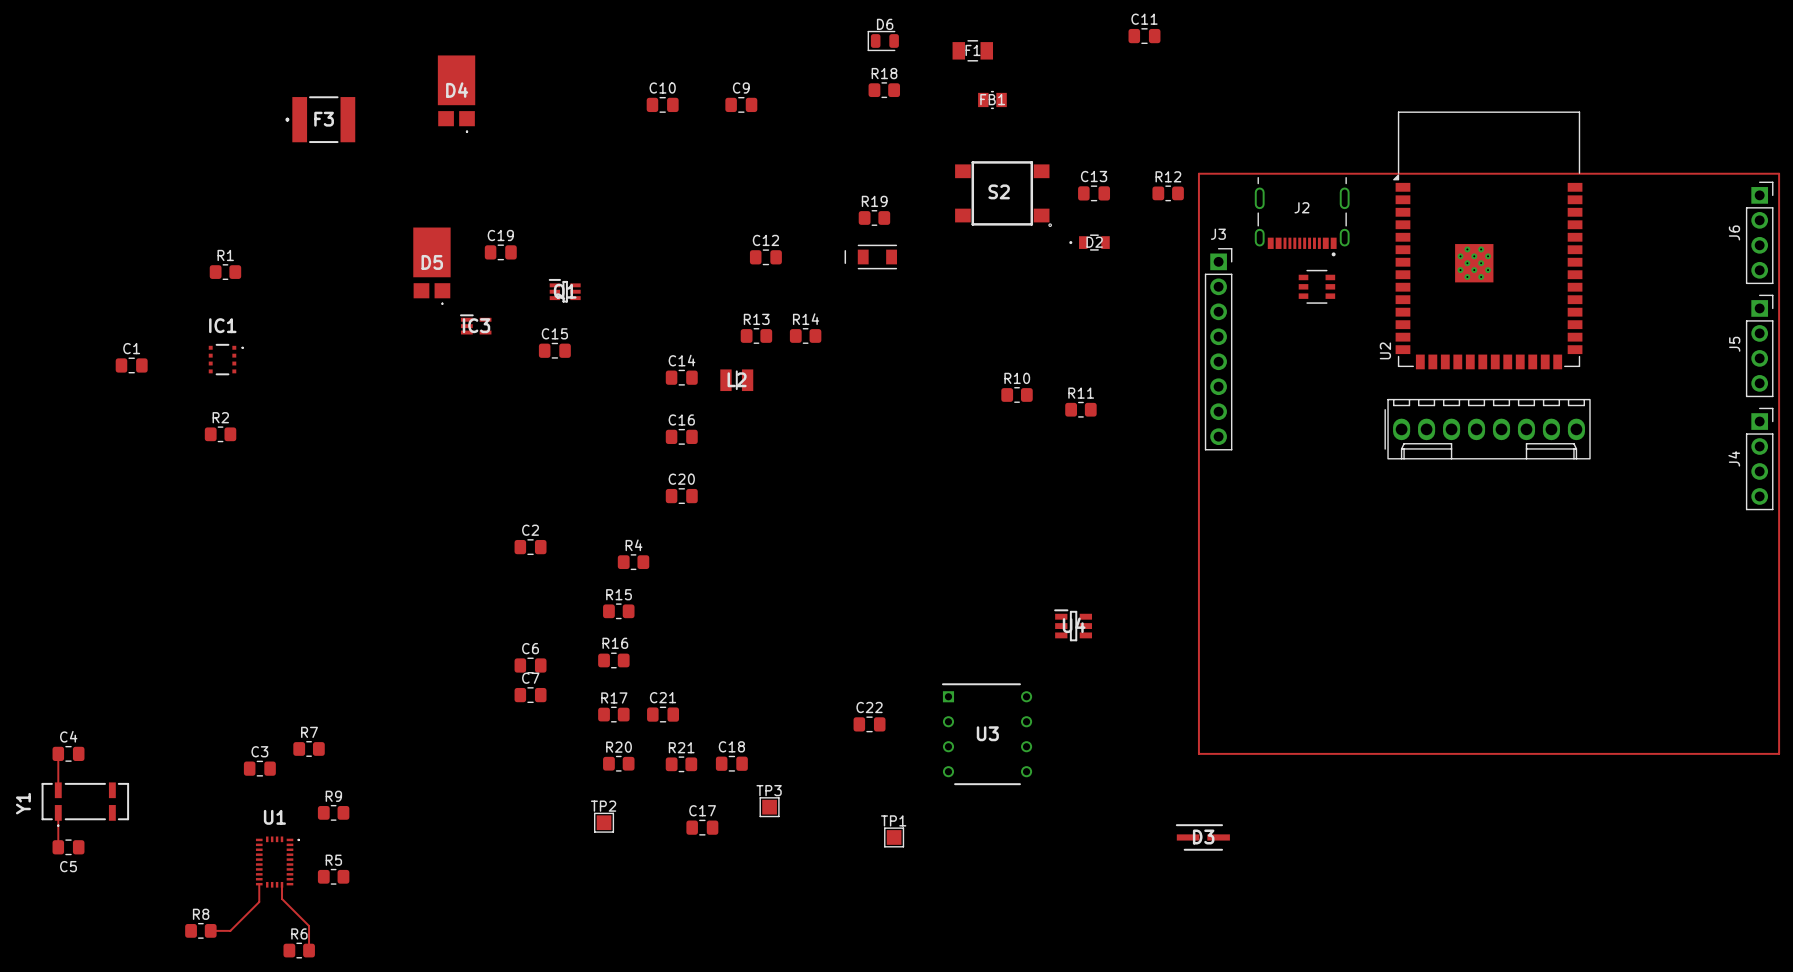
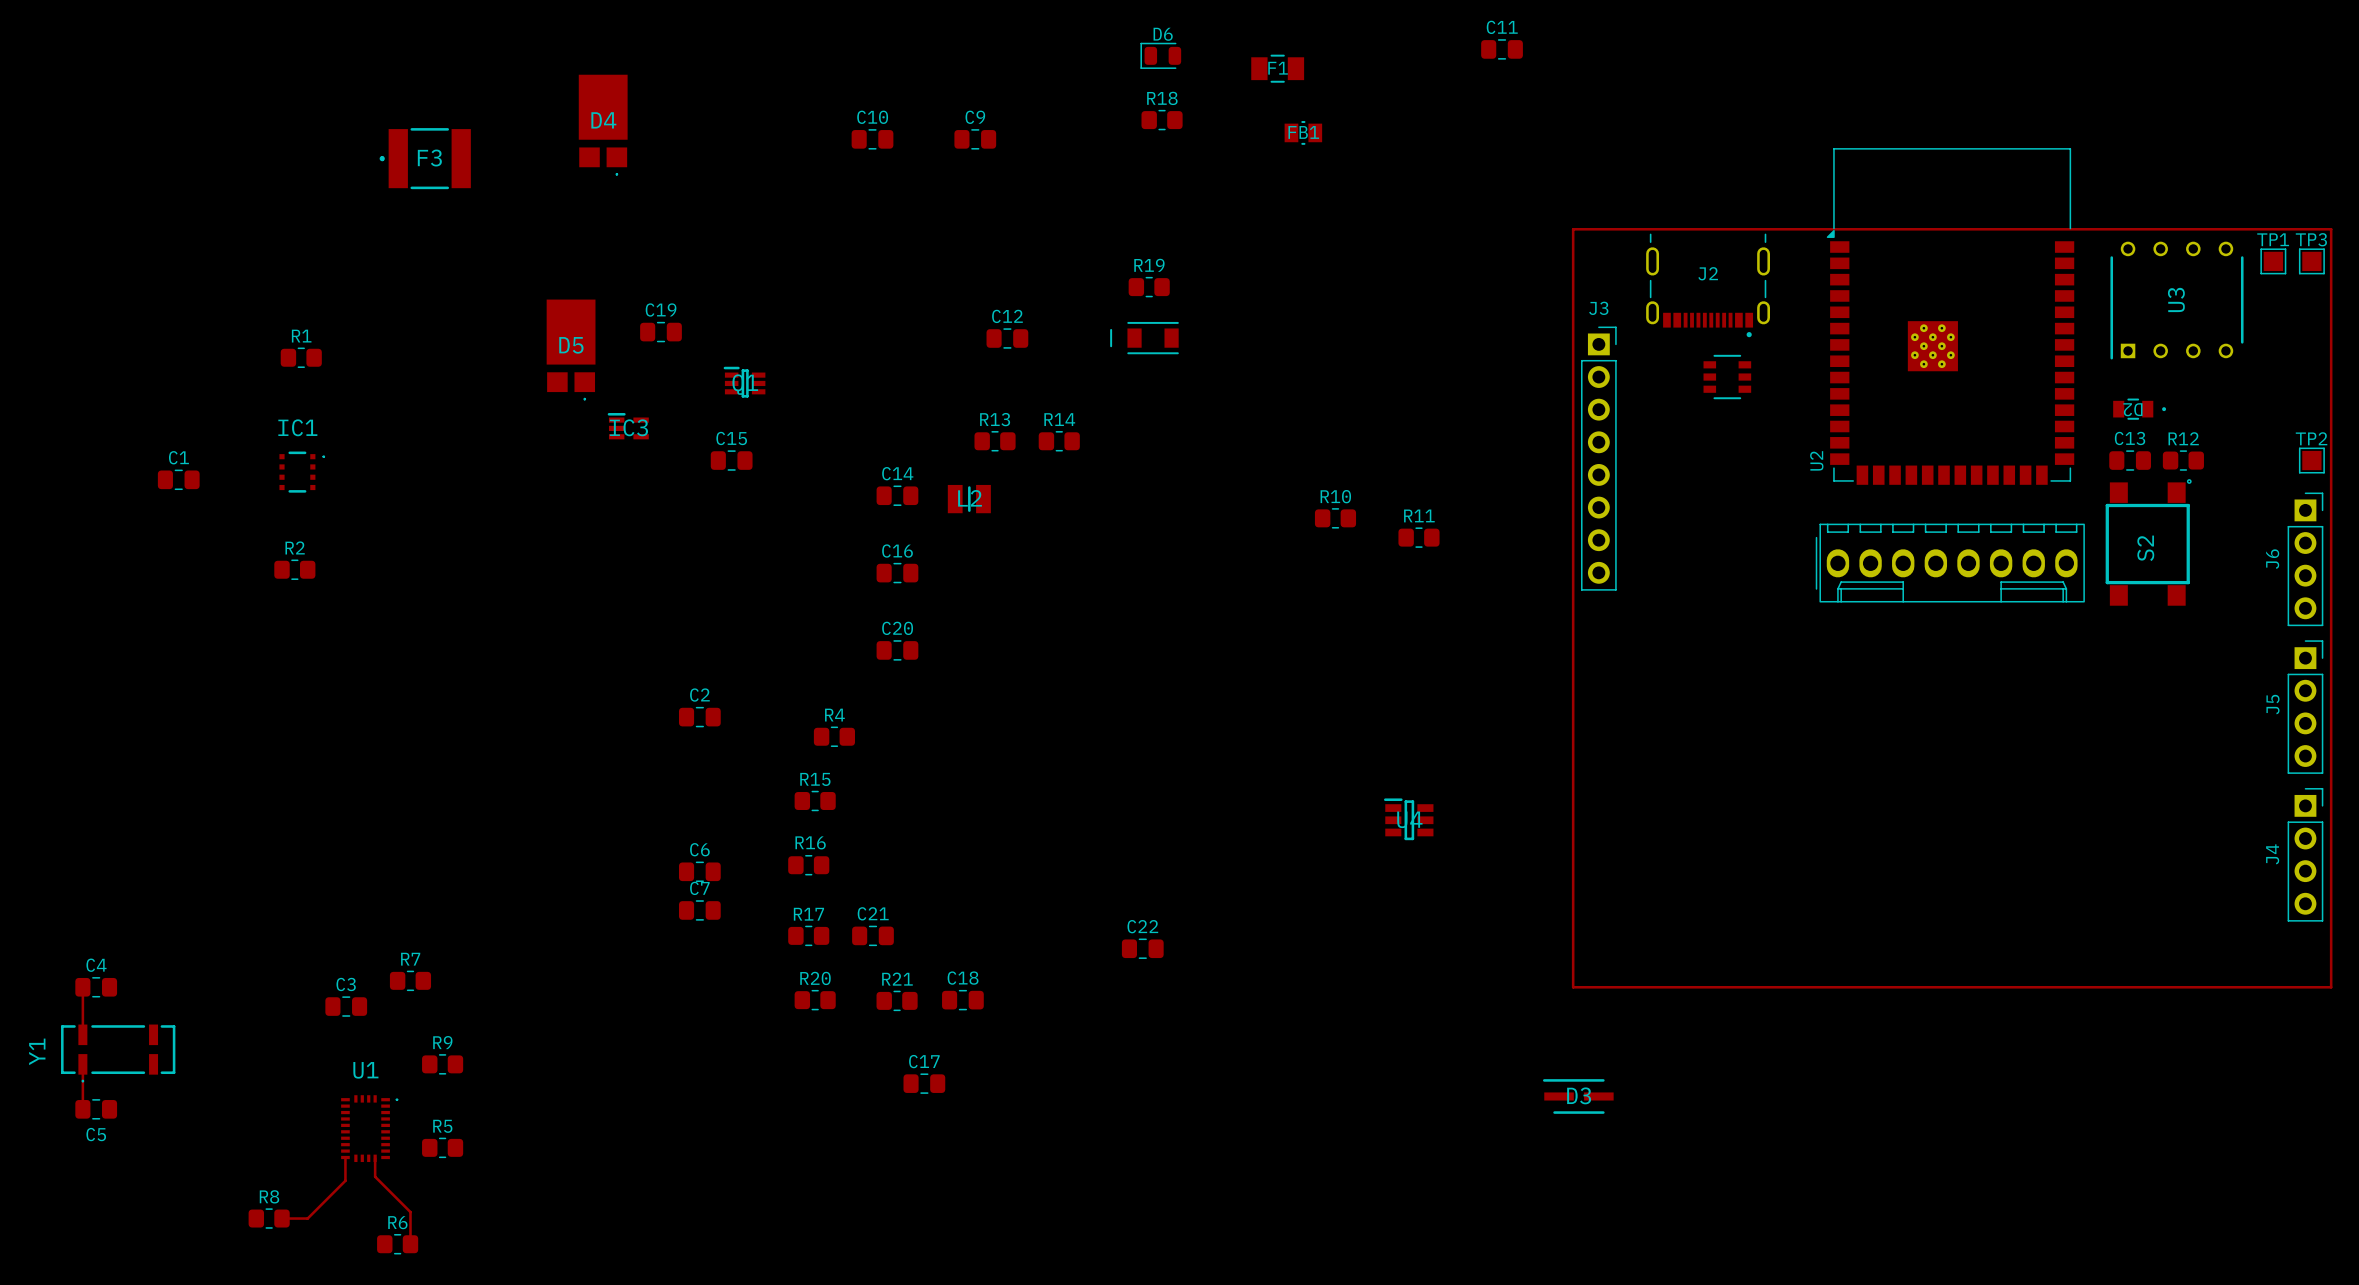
C13 position: (1094, 193) -> (2130, 460)
R12 position: (1168, 193) -> (2183, 460)
S2 rotation: 0° (1003, 194) -> 90° counterclockwise (2148, 542)
S2 position: (1003, 194) -> (2148, 542)
J6 position: (1759, 232) -> (2305, 559)
D2 rotation: 0° (1089, 242) -> 180° (2139, 409)
D2 position: (1089, 242) -> (2139, 409)
J5 position: (1759, 345) -> (2305, 707)
J4 position: (1759, 458) -> (2305, 854)
U3 rotation: 0° (987, 734) -> 90° counterclockwise (2176, 300)
U3 position: (987, 734) -> (2176, 300)
TP3 position: (769, 807) -> (2311, 261)
TP2 position: (604, 822) -> (2311, 460)
TP1 position: (894, 837) -> (2273, 261)

